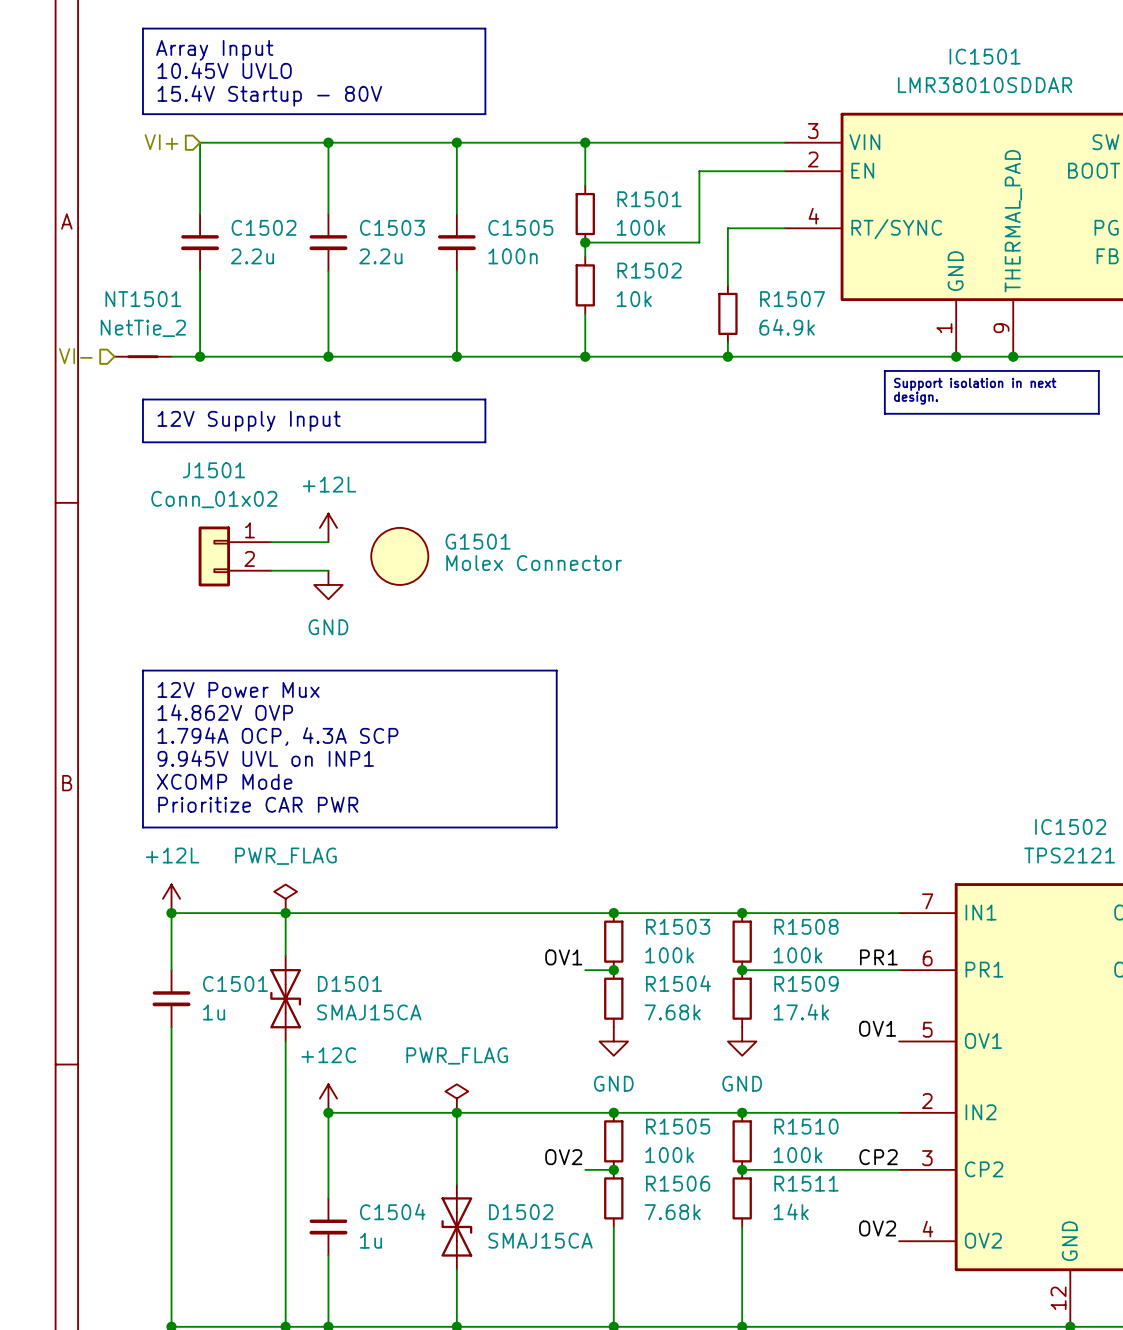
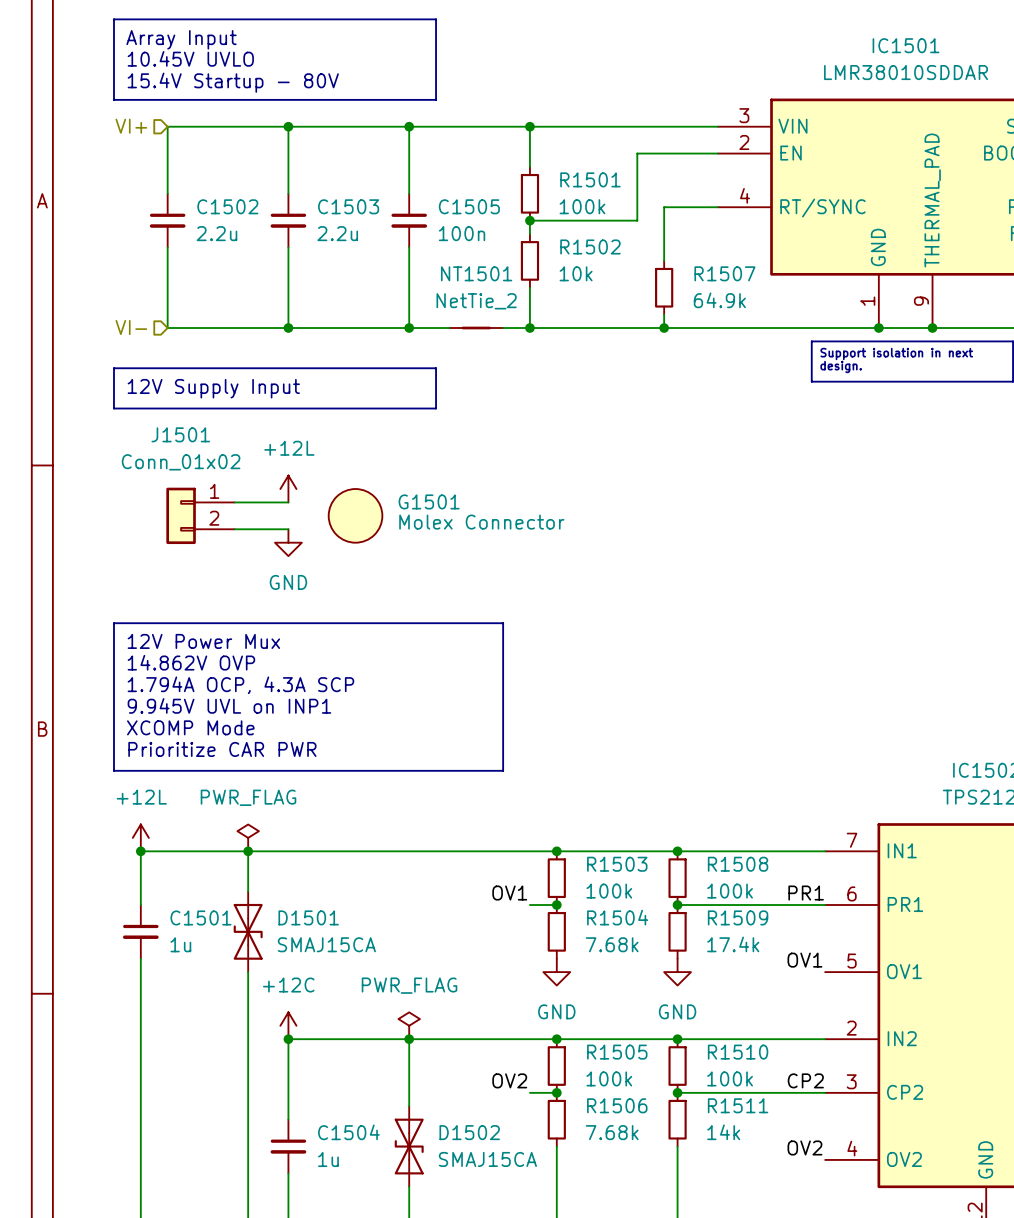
hierarchical label position: VI- (75, 356) -> VI- (131, 327)
NT1501 position: (142, 356) -> (476, 328)
wire: (171, 356) (200, 356) -> none
junction: (200, 356) -> none

